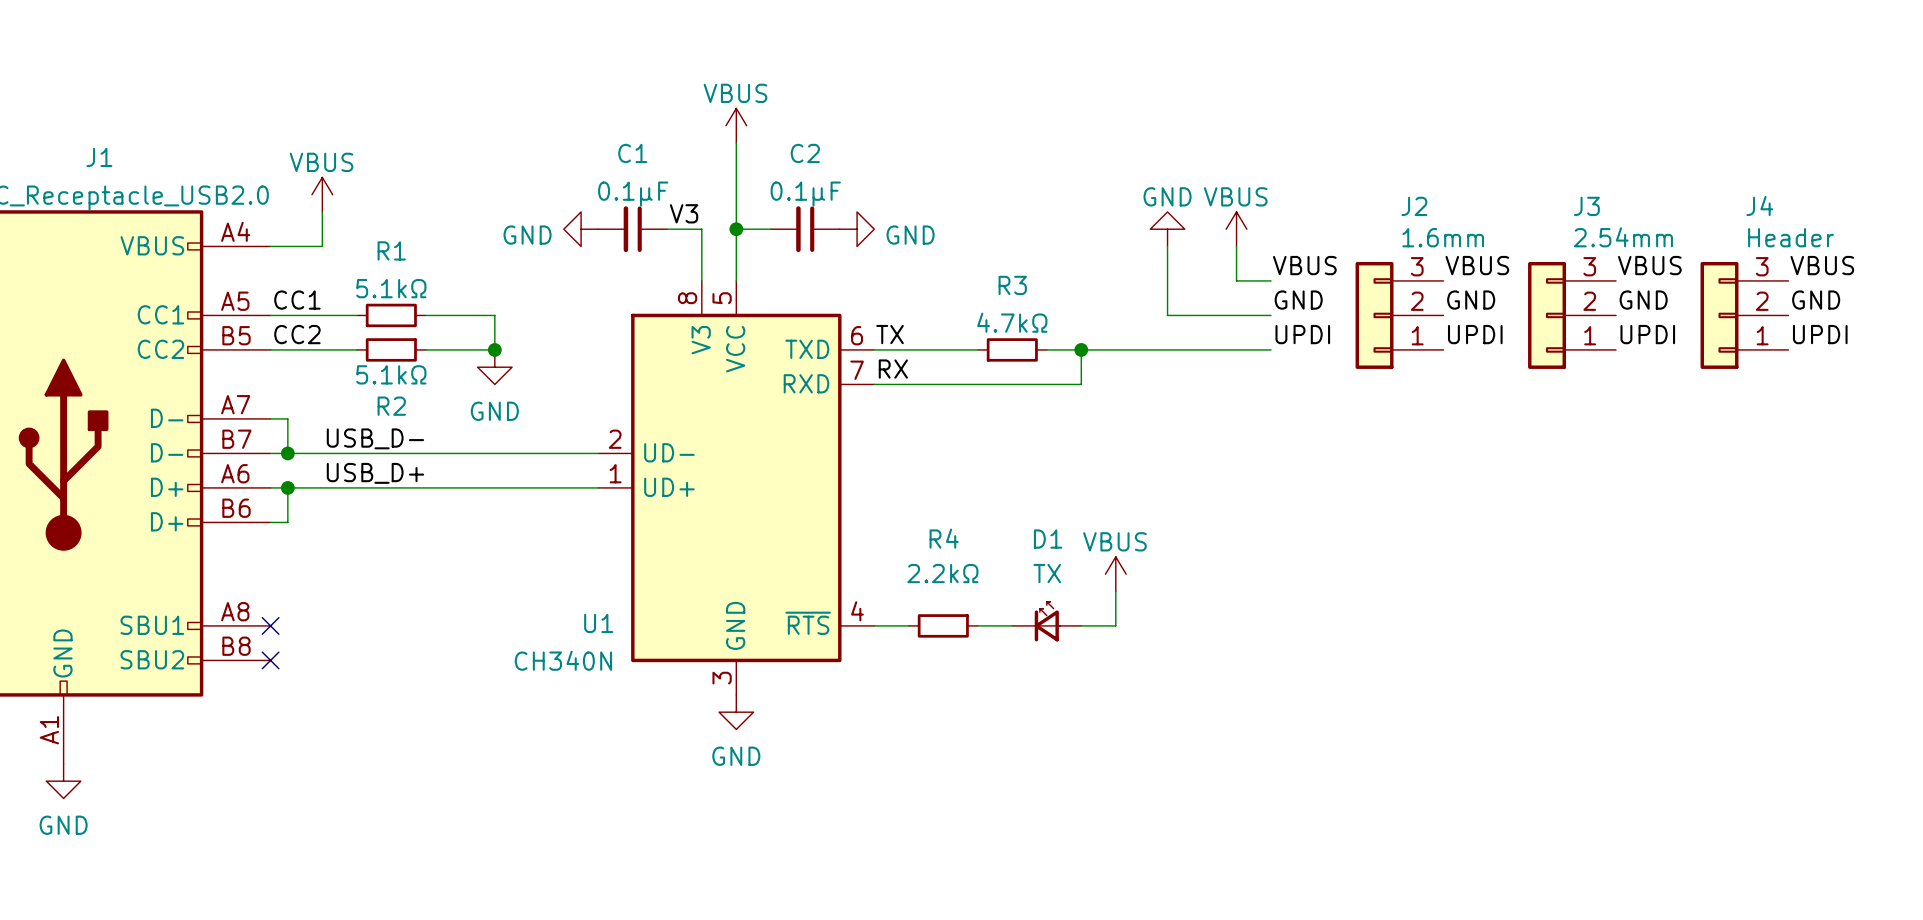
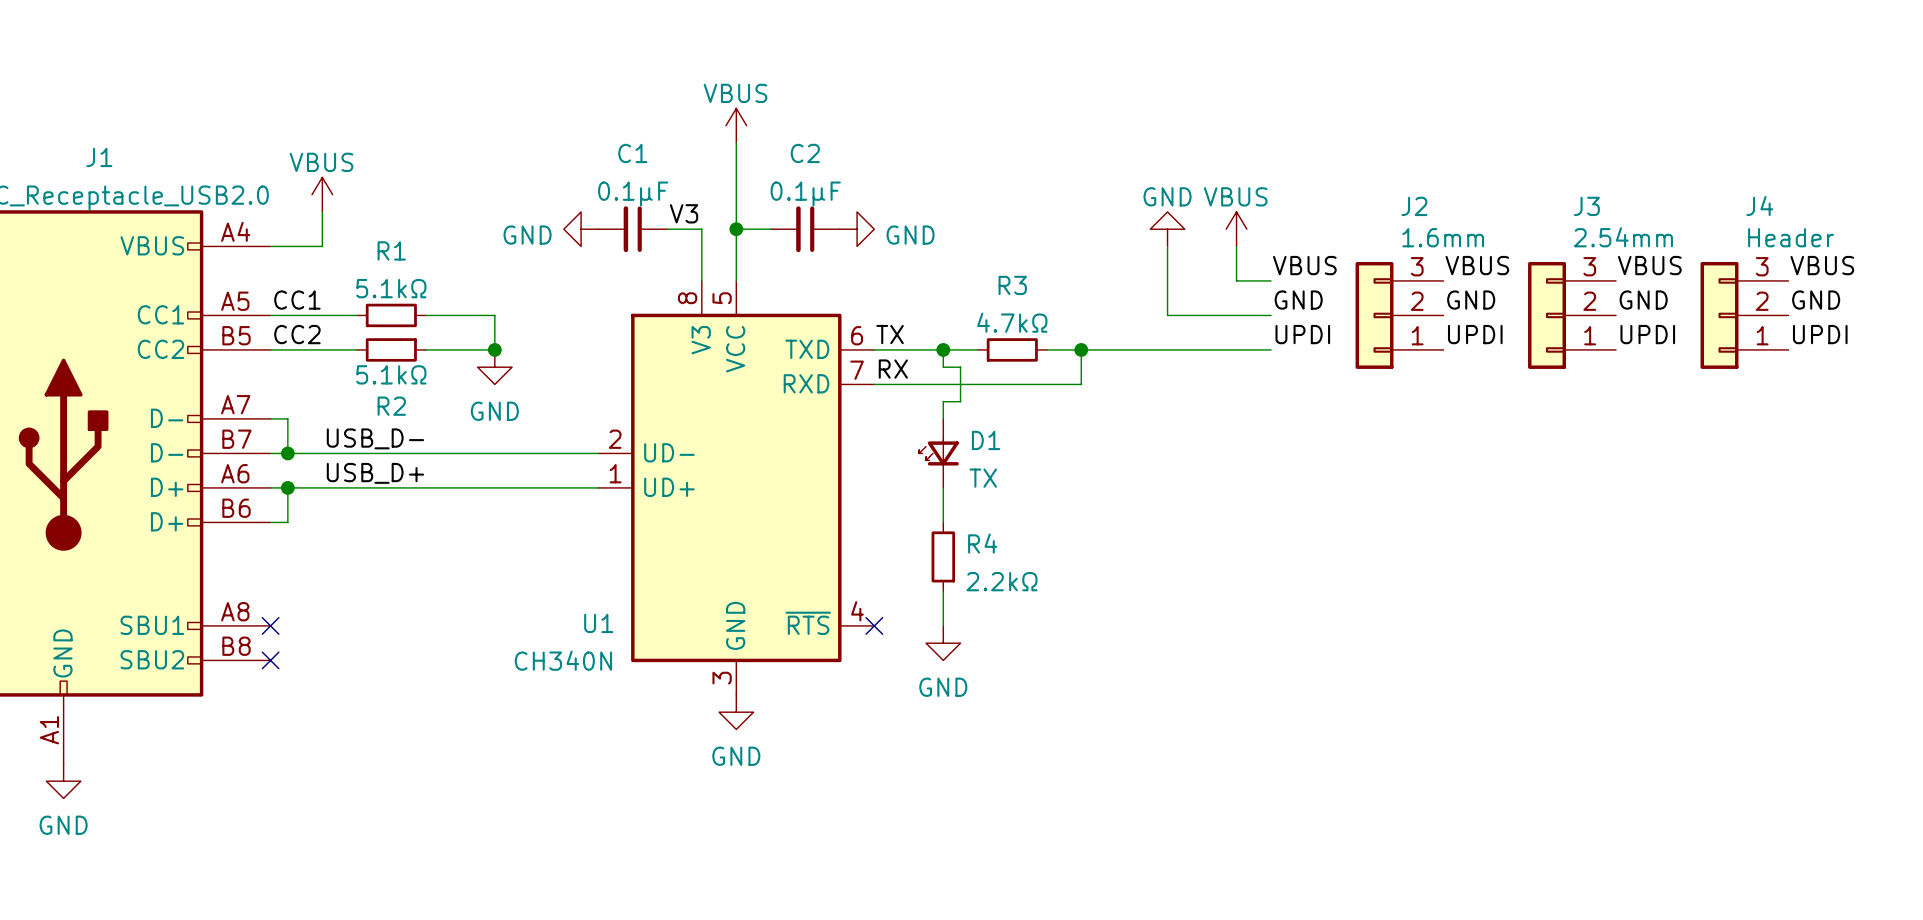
wire: none -> (943, 349) (943, 367) (960, 367) (960, 401) (943, 401) (943, 418)
junction: none -> (943, 349)
wire: none -> (943, 487) (943, 522)
R4 name position: R4 (944, 538) -> R4 (982, 543)
D1 name position: D1 (1048, 539) -> D1 (986, 440)
R4 value position: 2.2kΩ (942, 573) -> 2.2kΩ (1001, 581)
D1 value position: TX (1047, 573) -> TX (983, 478)
power symbol: VBUS (1115, 574) -> none
wire: none -> (943, 591) (943, 625)
wire: (1115, 591) (1115, 625) (1081, 625) -> none
D1 position: (1046, 621) -> (938, 453)
D1 rotation: 0° (1047, 621) -> 90° counterclockwise (938, 452)
wire: (874, 625) (908, 625) -> none
no-connect mark: none -> (874, 625)
R4 rotation: 0° (943, 625) -> 90° clockwise (943, 556)
R4 position: (943, 625) -> (943, 556)
wire: (977, 625) (1012, 625) -> none
power symbol: none -> GND (943, 643)

